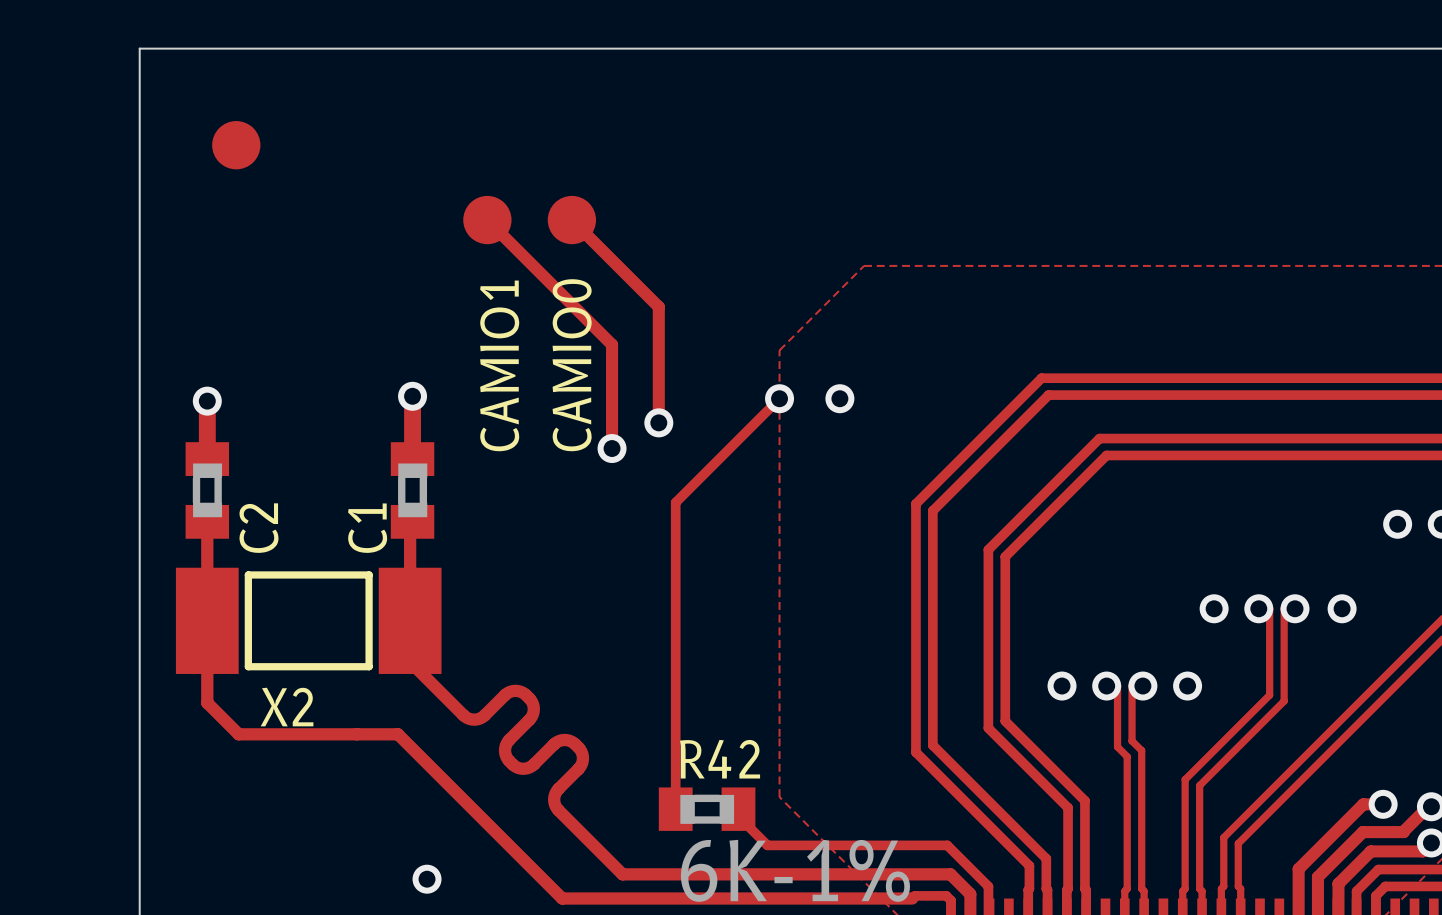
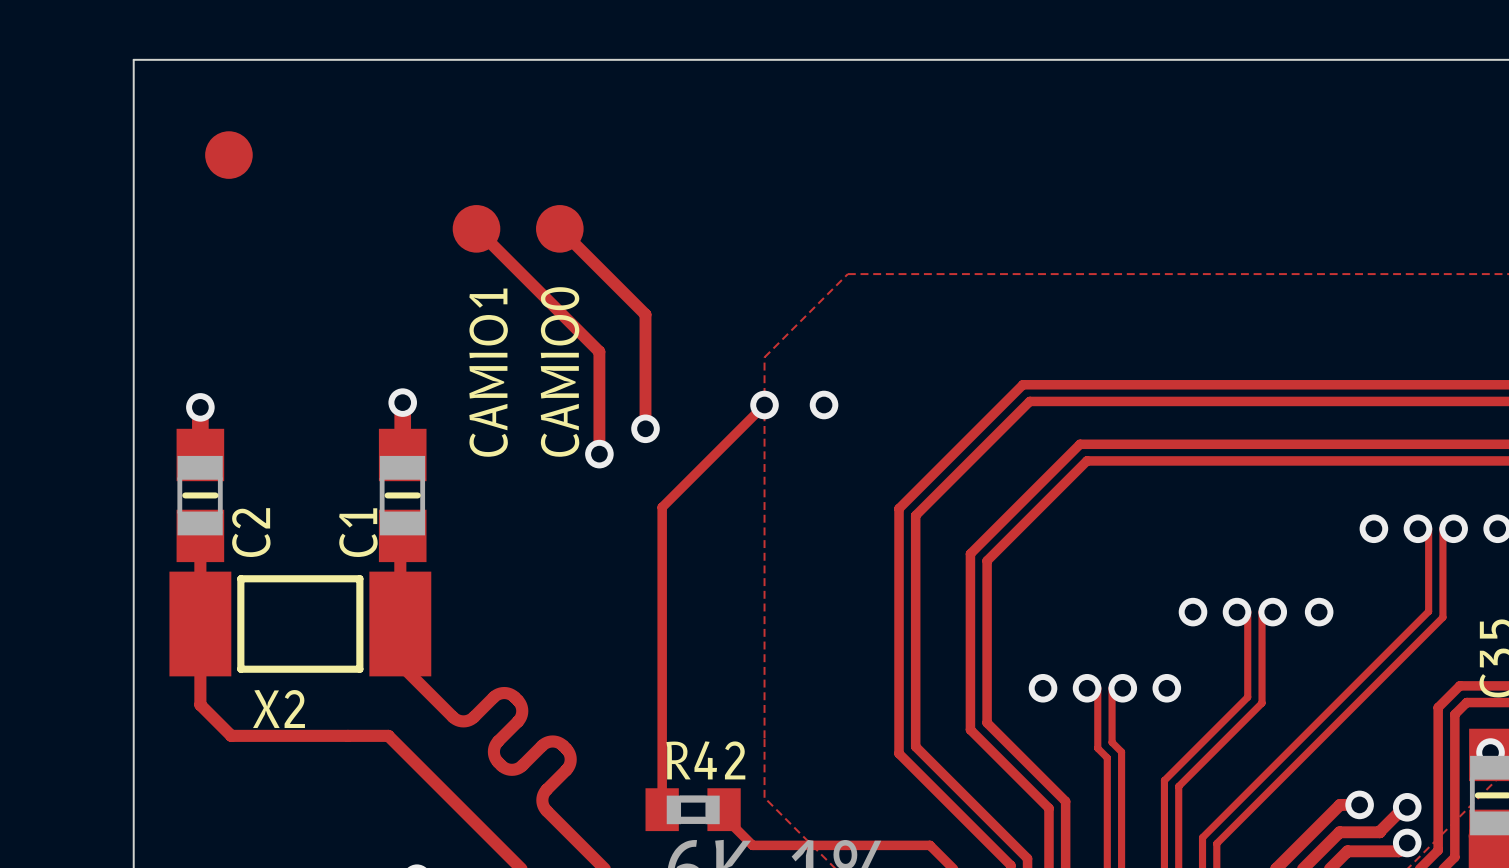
C2 footprint: [185, 442, 230, 539] -> [176, 428, 225, 563]
C1 footprint: [390, 442, 435, 539] -> [378, 428, 427, 563]

